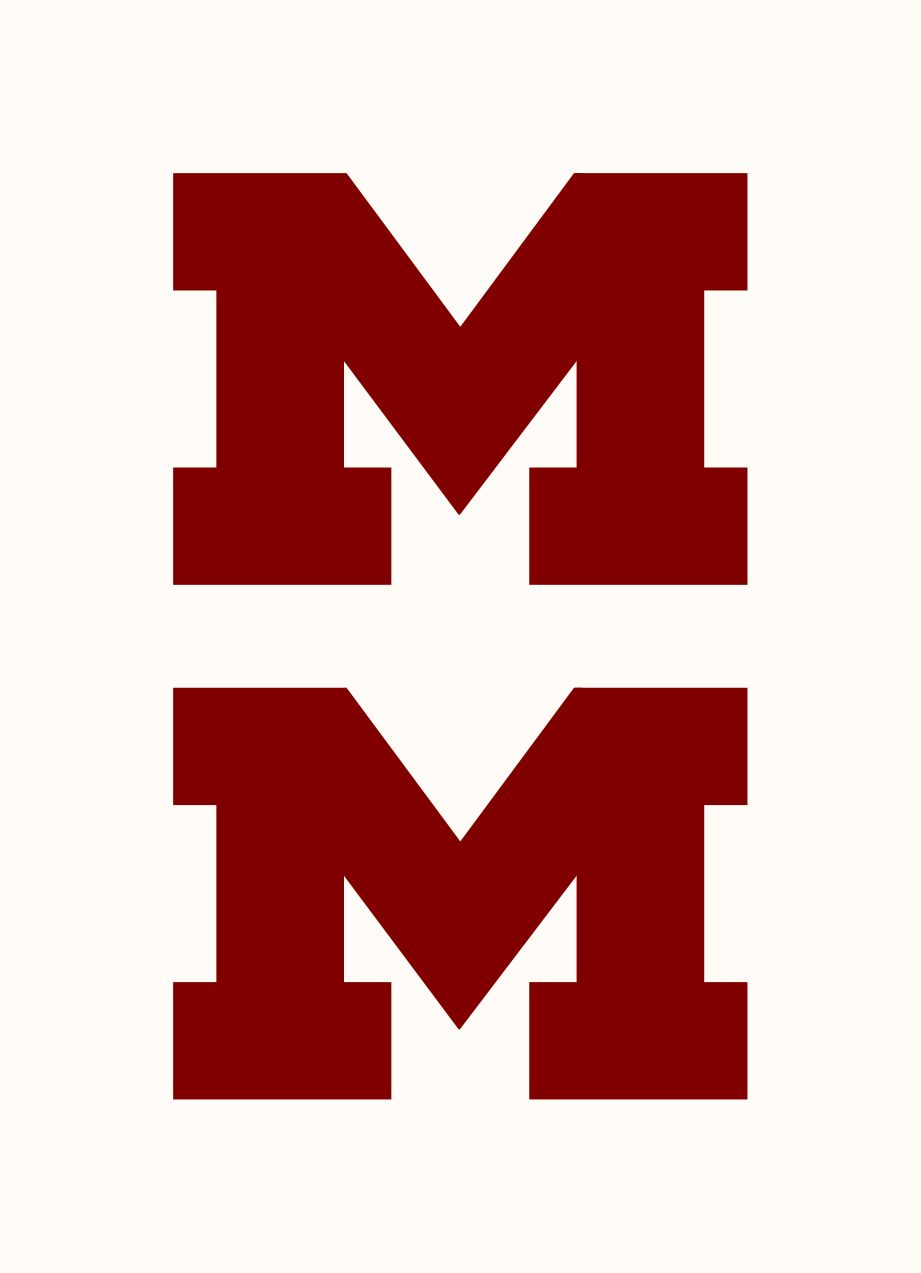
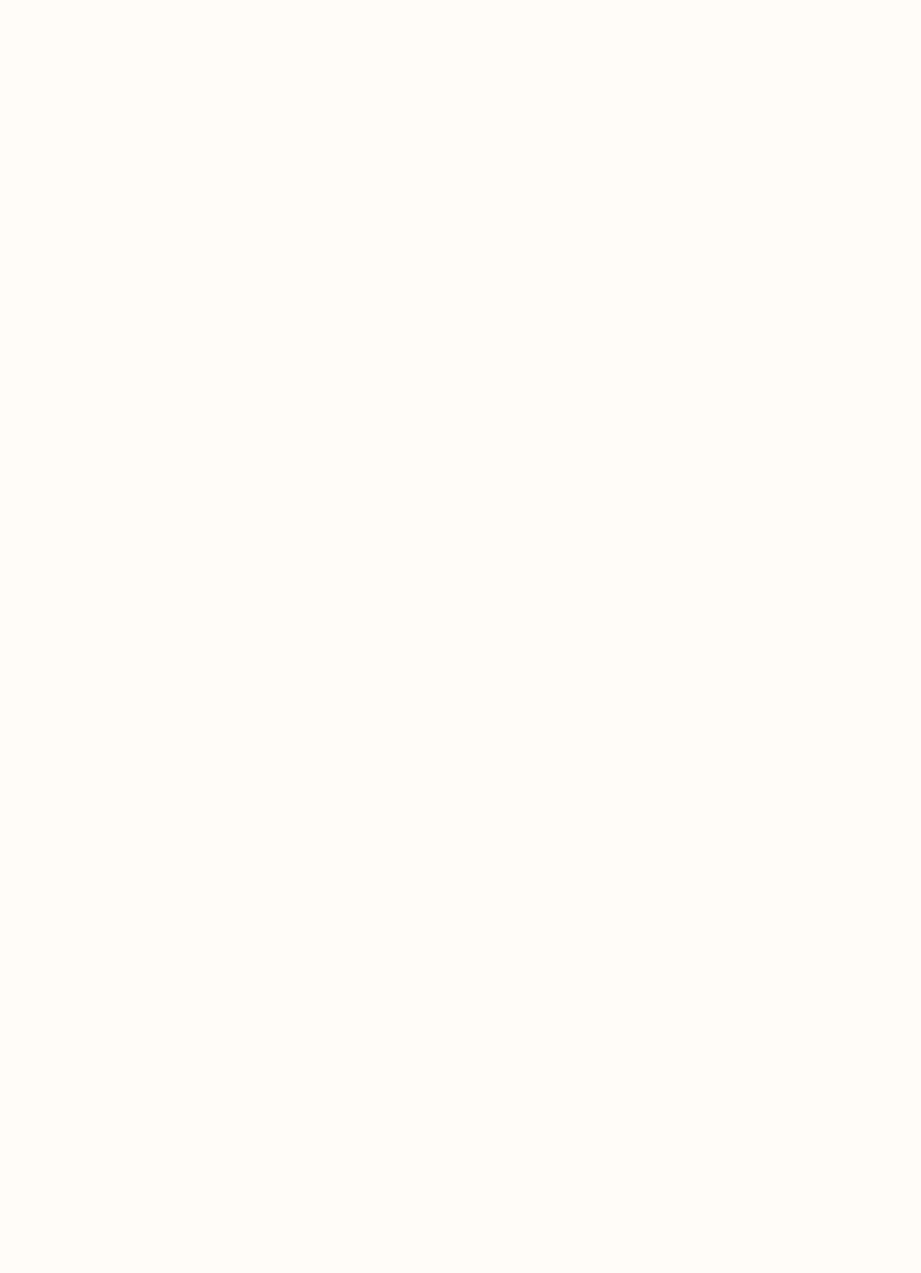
part: (460, 378) -> none
part: (460, 893) -> none

